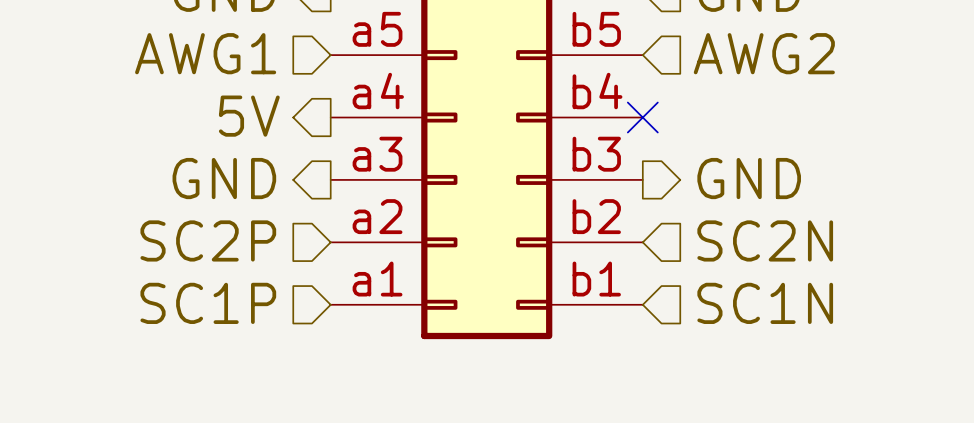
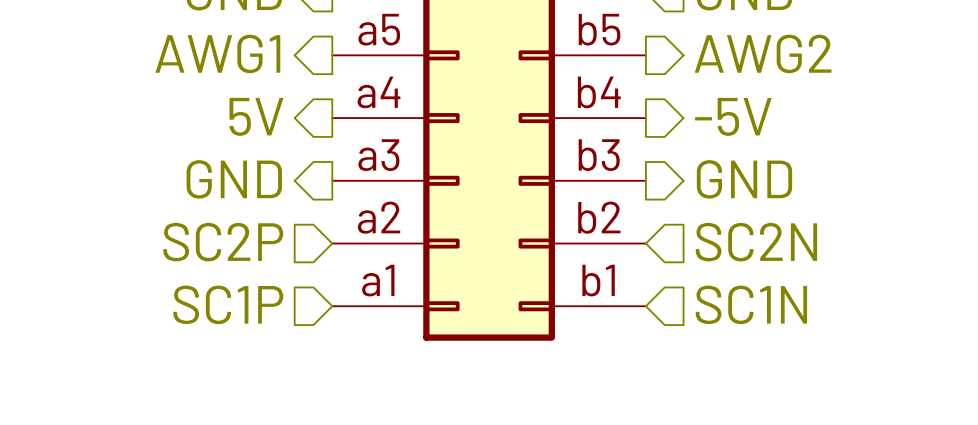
hierarchical label shape: input (205, 53) -> output (217, 53)
hierarchical label shape: input (764, 53) -> output (763, 53)
hierarchical label: none -> -5V (733, 116)
no-connect mark: (642, 117) -> none

